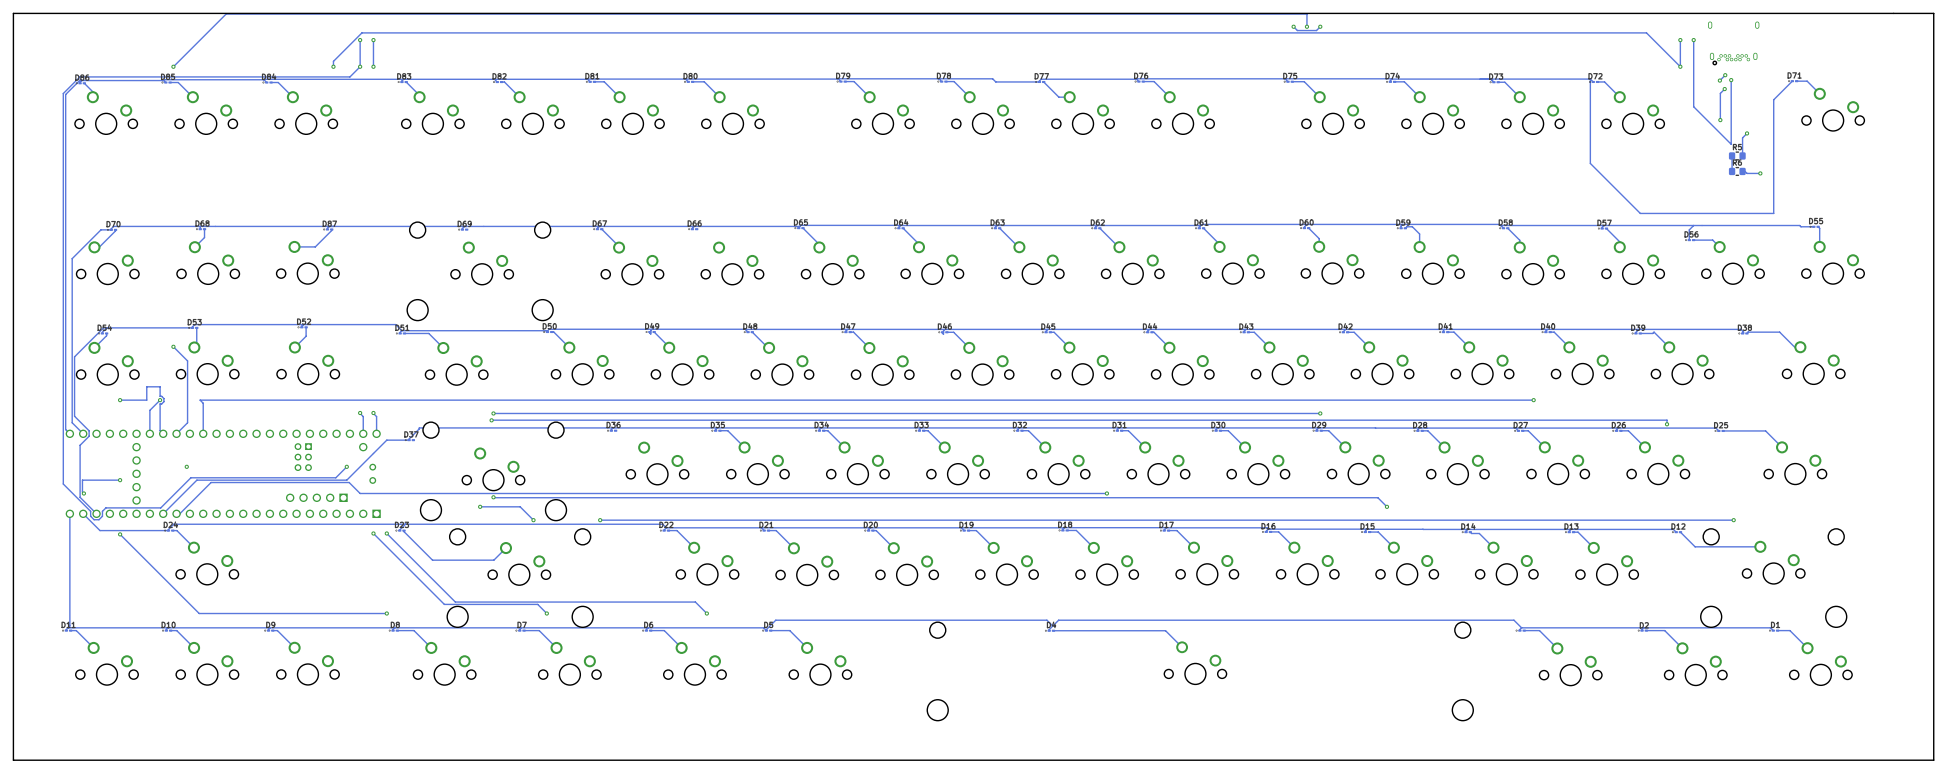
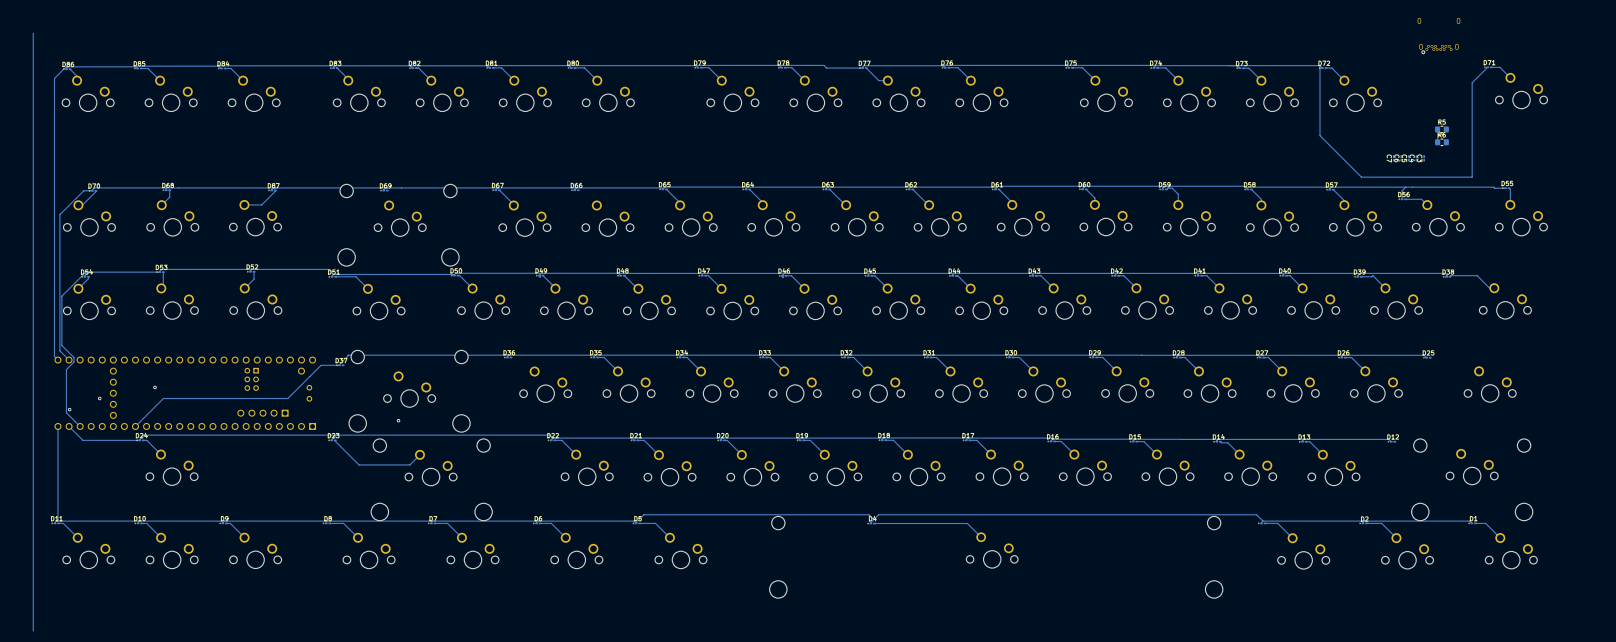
board edge: (1933, 13) (13, 13) (13, 760) (1933, 760) (1933, 13) -> none
via: (1293, 26) -> none
track: (1306, 26) (1306, 14) (226, 14) (173, 66) -> none
via: (1306, 26) -> none
track: (1320, 26) (1316, 30) (1297, 30) (1293, 26) -> none
via: (1320, 26) -> none
track: none -> (33, 33) (33, 630)
track: (360, 40) (360, 66) (349, 76) (79, 76) (63, 93) (63, 484) (90, 511) (90, 516) (94, 519) (98, 519) (105, 507) (160, 507) (190, 477) (335, 477) (346, 466) -> none
via: (360, 40) -> none
track: (373, 40) (373, 66) -> none
via: (373, 40) -> none
track: (1680, 40) (1680, 66) (1646, 32) (361, 32) (333, 61) (333, 66) -> none
via: (1680, 40) -> none
track: (1693, 40) (1693, 106) (1731, 144) (1731, 80) -> none
via: (1693, 40) -> none
via: (173, 66) -> none
via: (333, 66) -> none
via: (360, 66) -> none
via: (373, 66) -> none
via: (1680, 66) -> none
track: (1725, 75) (1719, 80) -> none
via: (1725, 75) -> none
via: (1719, 80) -> none
via: (1731, 80) -> none
track: (1724, 89) (1720, 93) (1720, 120) -> none
via: (1724, 89) -> none
via: (1720, 120) -> none
track: (1747, 133) (1742, 137) (1742, 155) -> none
via: (1747, 133) -> none
track: (1742, 171) (1760, 173) -> none
via: (1760, 173) -> none
part: none -> (1393, 158)
part: none -> (1401, 158)
part: none -> (1408, 158)
part: none -> (1416, 158)
part: none -> (1424, 158)
track: (173, 346) (187, 360) (187, 422) (176, 433) -> none
via: (173, 346) -> none
track: (120, 400) (146, 400) (146, 386) (160, 386) (160, 396) (163, 398) (163, 401) (160, 403) (160, 430) (163, 433) -> none
via: (120, 400) -> none
track: (160, 400) (149, 410) (149, 433) -> none
via: (160, 400) -> none
track: (1533, 400) (200, 400) (203, 403) (203, 433) -> none
via: (1533, 400) -> none
track: (360, 413) (363, 416) (363, 433) -> none
via: (360, 413) -> none
track: (373, 413) (376, 416) (376, 433) -> none
via: (373, 413) -> none
via: (493, 413) -> none
track: (1320, 413) (493, 413) -> none
via: (1320, 413) -> none
track: (491, 420) (1667, 420) (1667, 424) -> none
via: (491, 420) -> none
via: (1667, 424) -> none
track: (1723, 430) (1765, 430) (1782, 447) -> none
via: (346, 466) -> none
track: (120, 480) (82, 480) (83, 493) -> none
track: (1106, 493) (360, 493) (349, 482) (211, 482) (179, 513) (176, 513) -> none
via: (1106, 493) -> none
track: (493, 497) (1377, 497) (1386, 506) -> none
via: (493, 497) -> none
track: (480, 506) (520, 506) (533, 520) -> none
via: (1386, 506) -> none
via: (533, 520) -> none
via: (600, 520) -> none
track: (1733, 520) (600, 520) -> none
via: (1733, 520) -> none
track: (1680, 532) (1695, 546) (1760, 546) -> none
track: (373, 533) (444, 604) (537, 604) (546, 613) -> none
via: (373, 533) -> none
track: (386, 533) (455, 602) (695, 602) (706, 613) -> none
via: (386, 533) -> none
track: (120, 534) (199, 613) (386, 613) -> none
via: (120, 534) -> none
via: (386, 613) -> none
via: (546, 613) -> none
via: (706, 613) -> none

